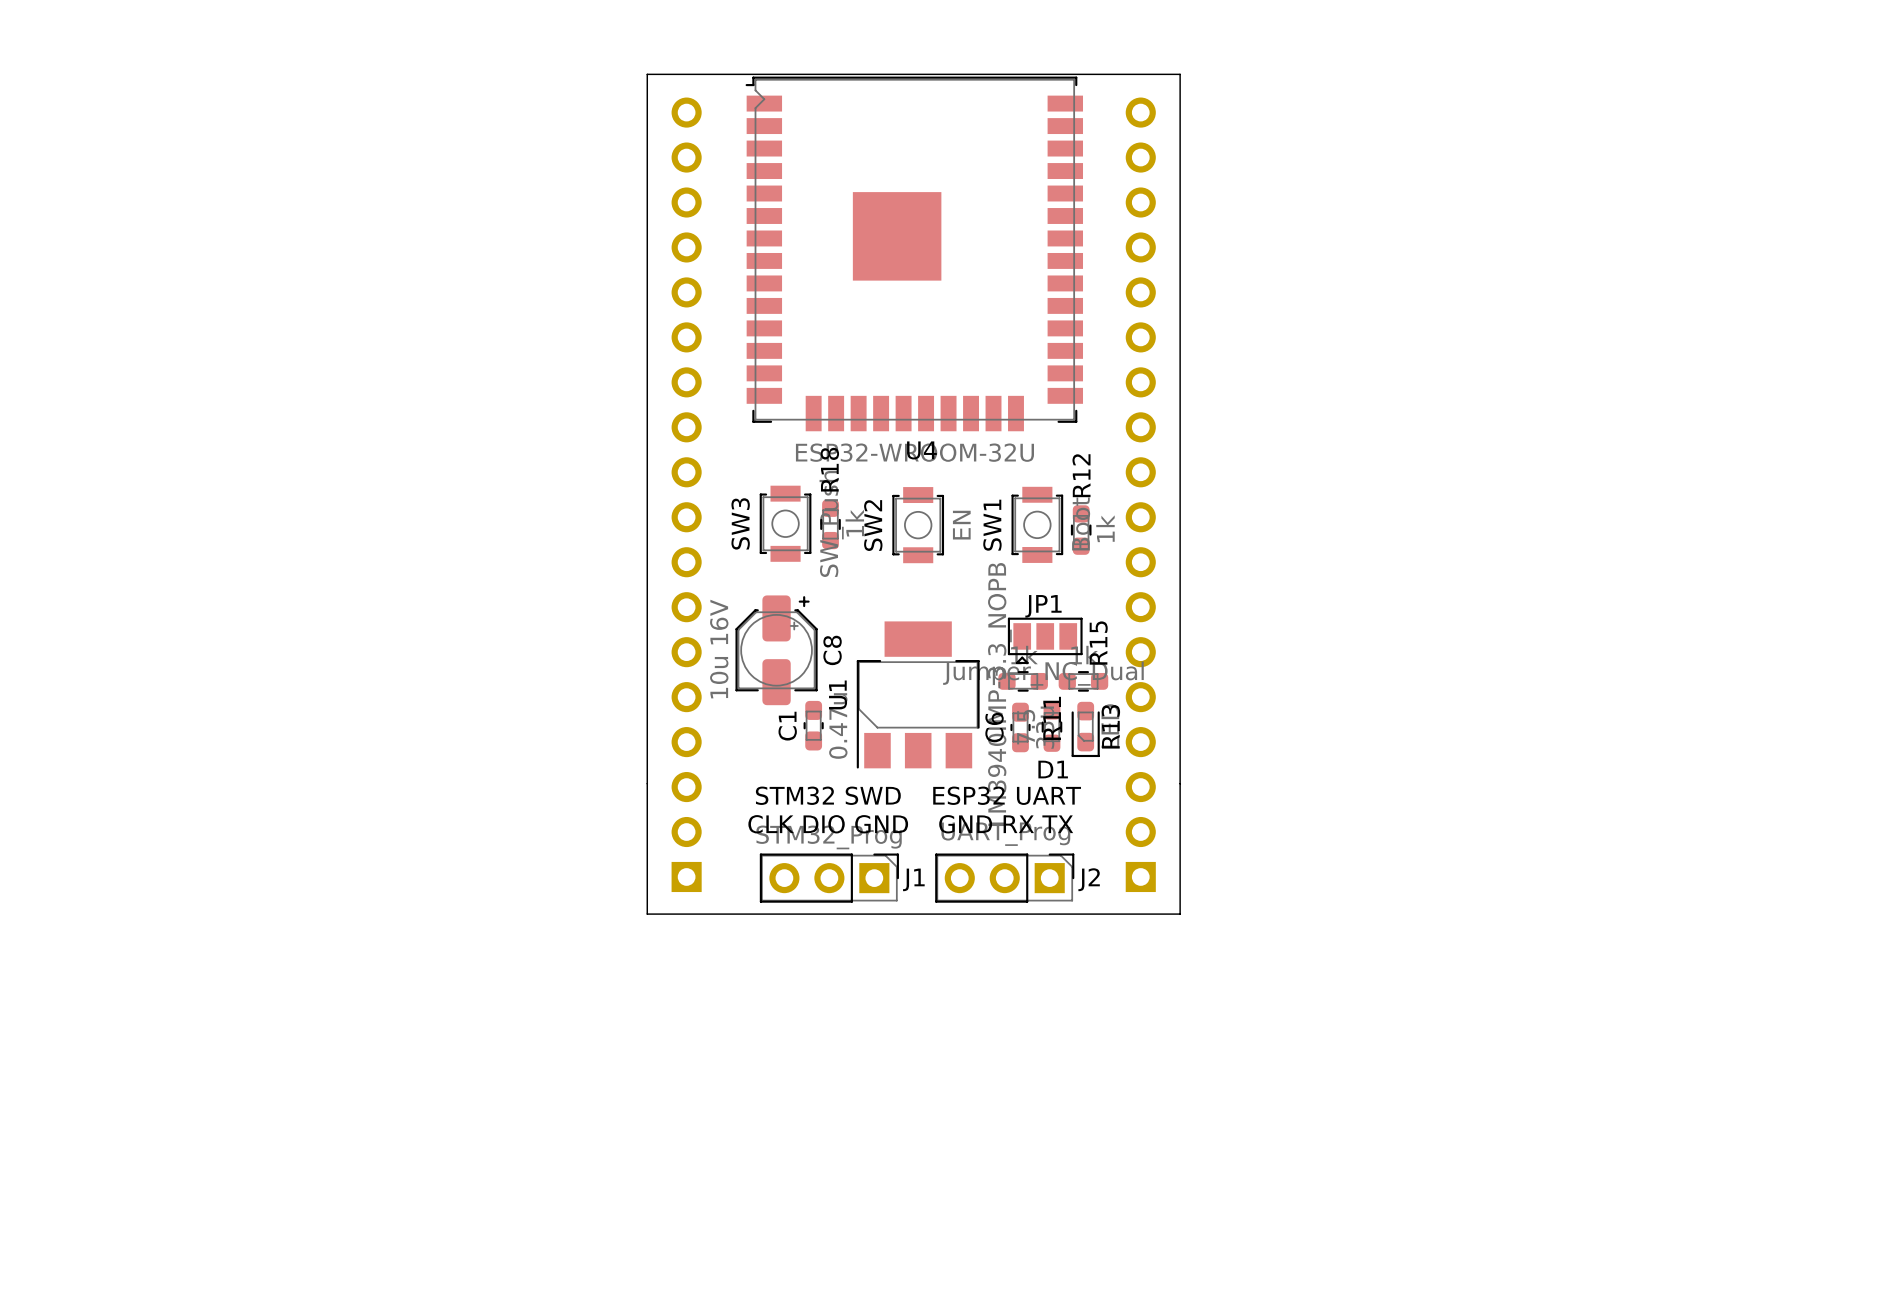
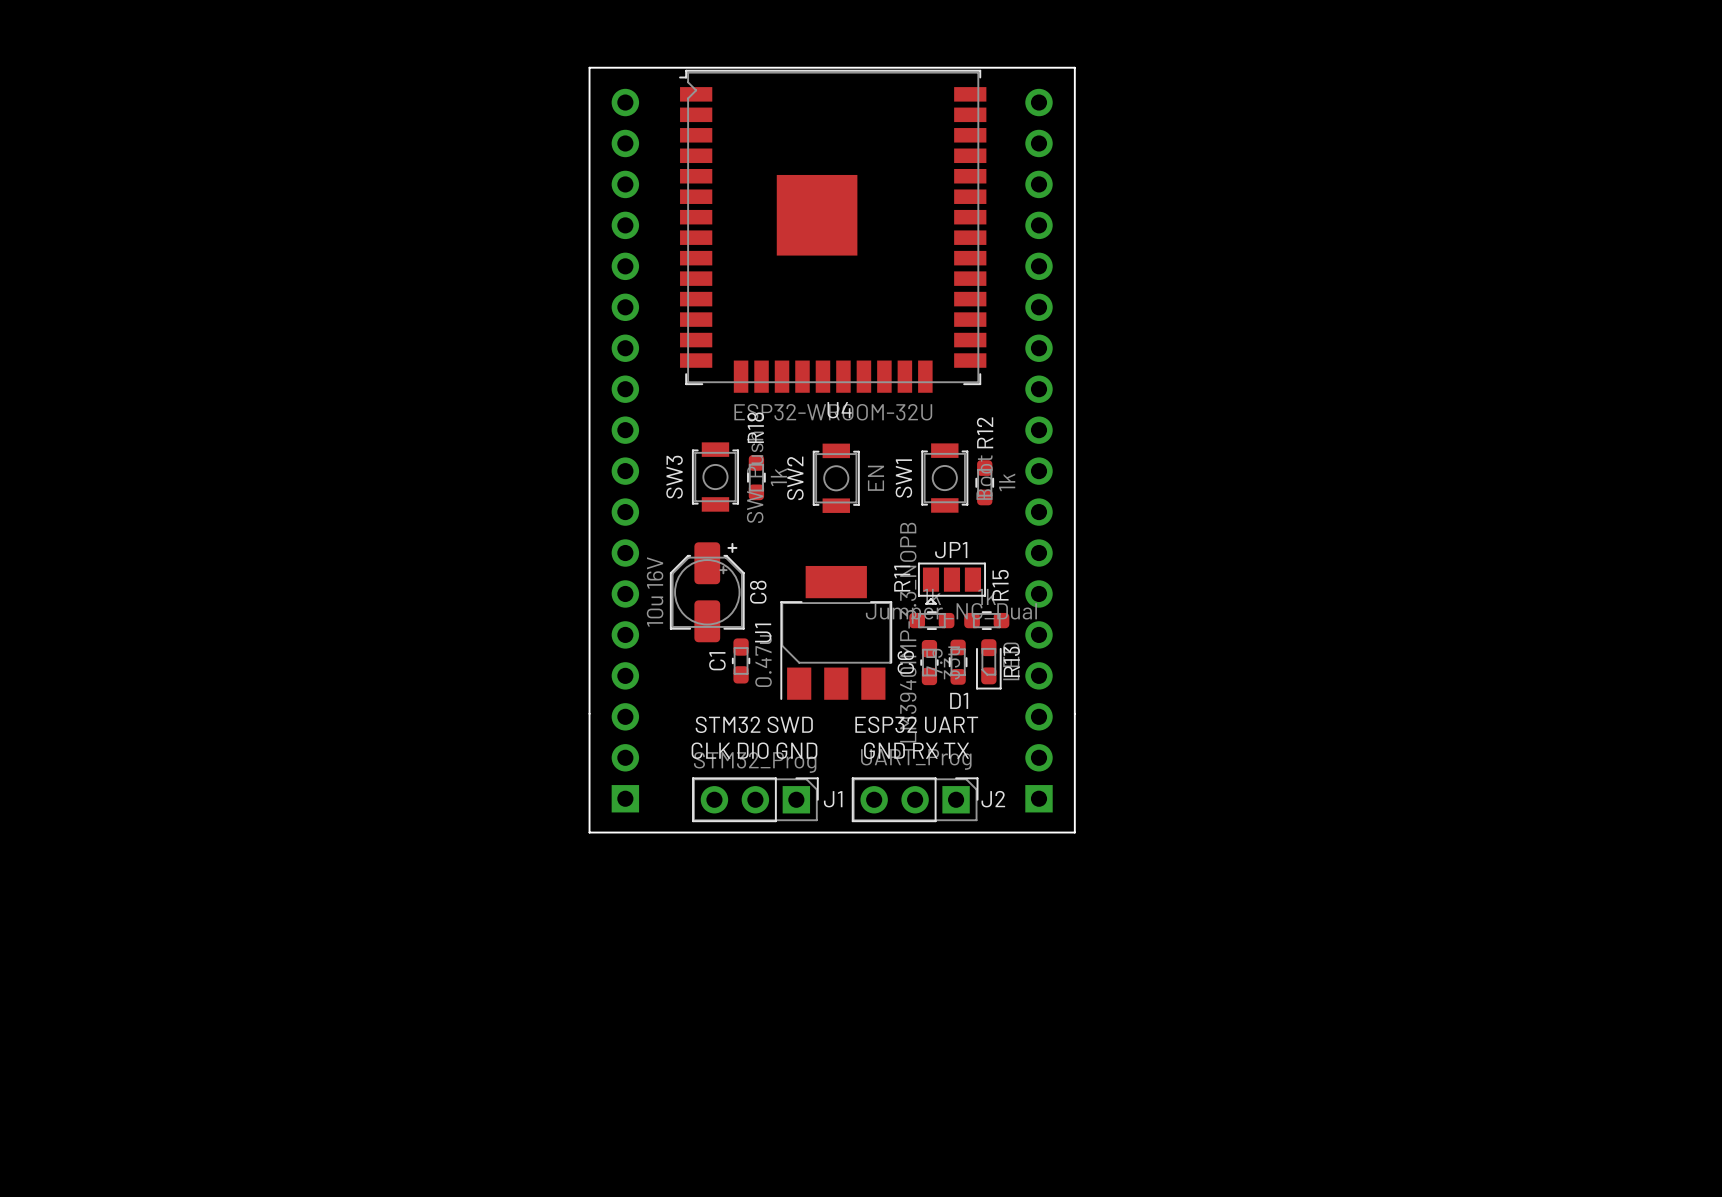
R11 name position: R11 (1052, 718) -> R11 (902, 578)

